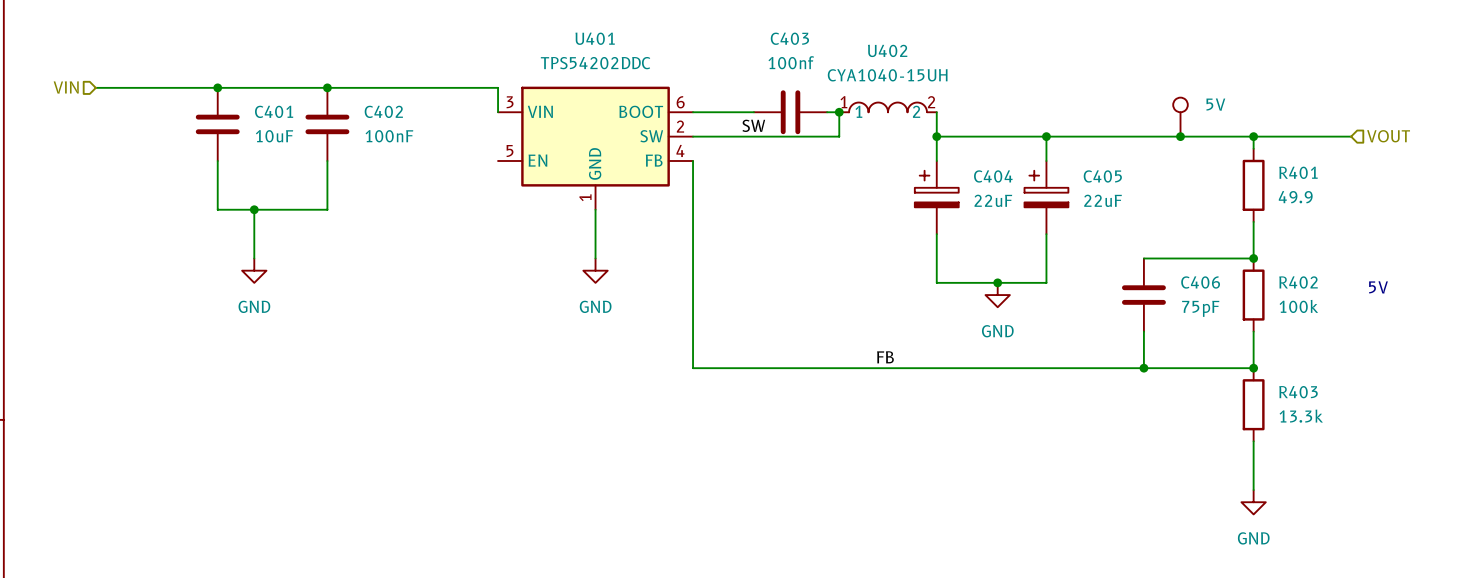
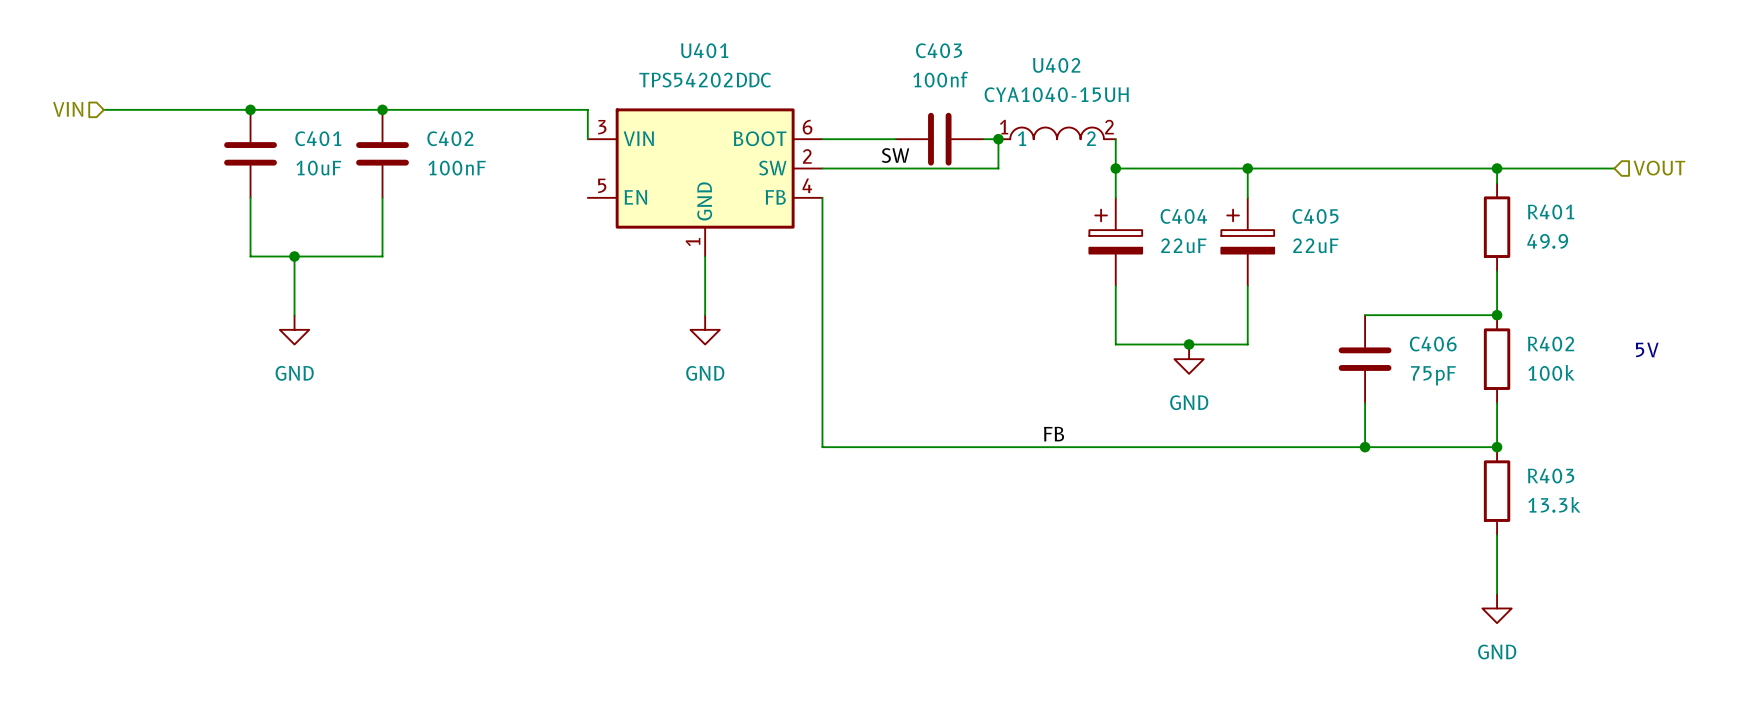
part: (1180, 117) -> none
junction: (1180, 136) -> none

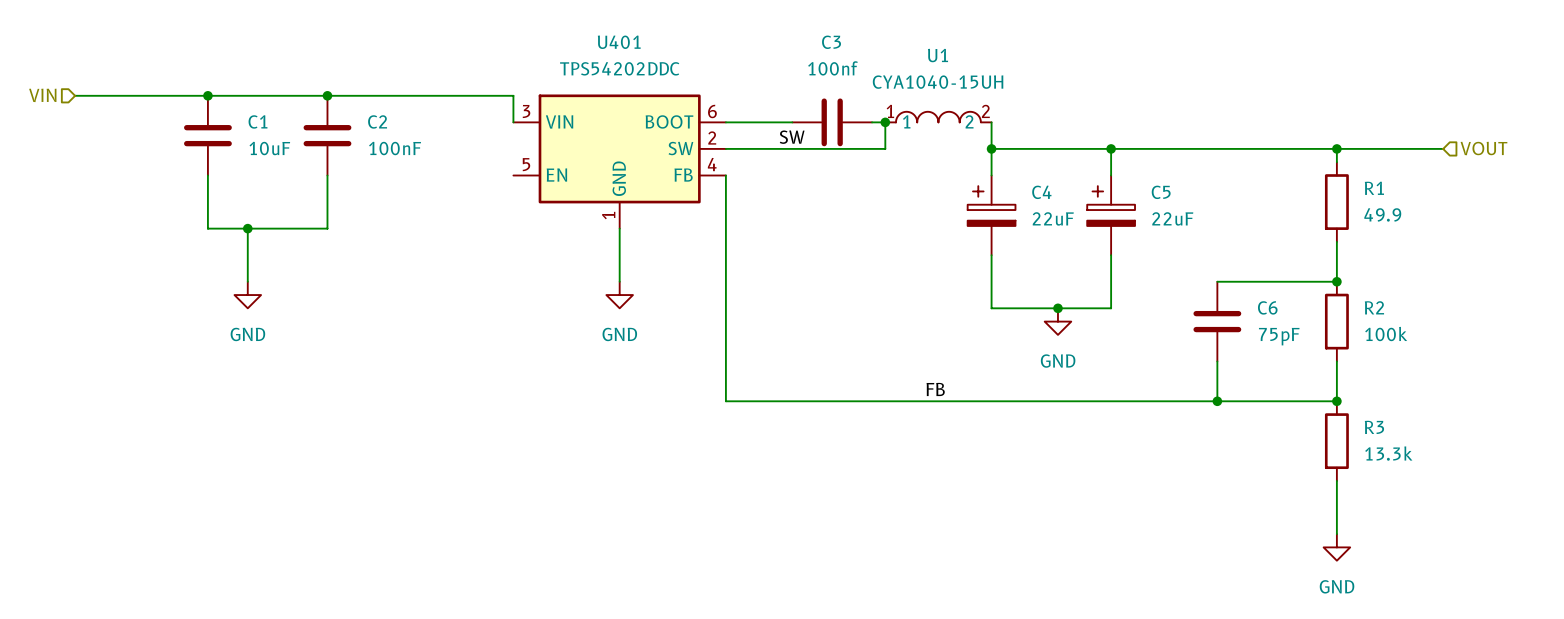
C403 name: C403 (939, 50) -> C3 (831, 42)
U402 name: U402 (1056, 65) -> U1 (938, 55)
C401 name: C401 (318, 138) -> C1 (258, 121)
C402 name: C402 (450, 138) -> C2 (377, 121)
R401 name: R401 (1551, 212) -> R1 (1374, 188)
C404 name: C404 (1183, 216) -> C4 (1041, 192)
C405 name: C405 (1315, 216) -> C5 (1161, 192)
C406 name: C406 (1433, 344) -> C6 (1267, 307)
R402 name: R402 (1551, 344) -> R2 (1374, 307)
text: 5V (1647, 349) -> none
R403 name: R403 (1551, 476) -> R3 (1374, 427)

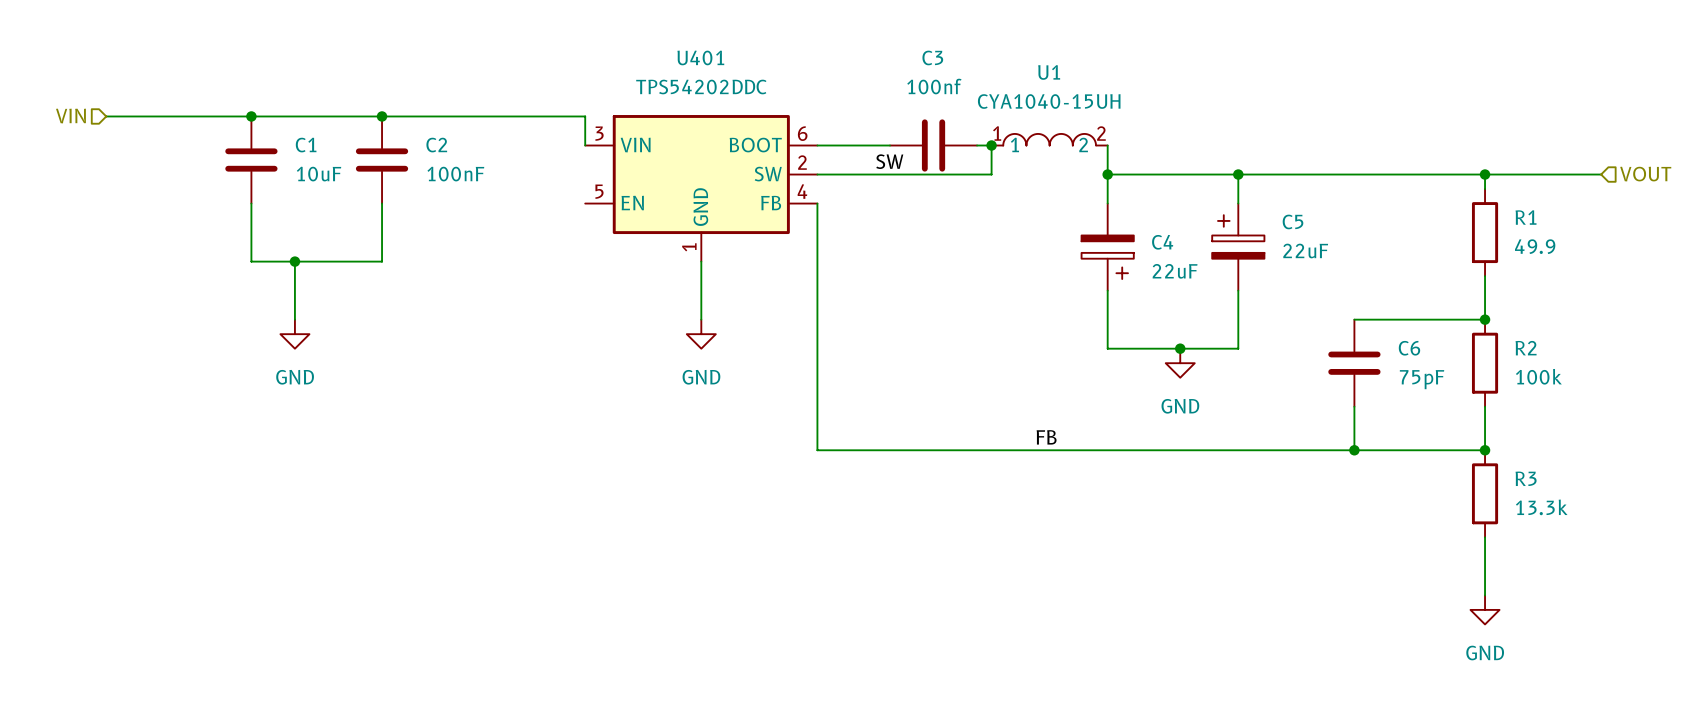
C4 rotation: 0° (991, 206) -> 180° (1107, 257)

